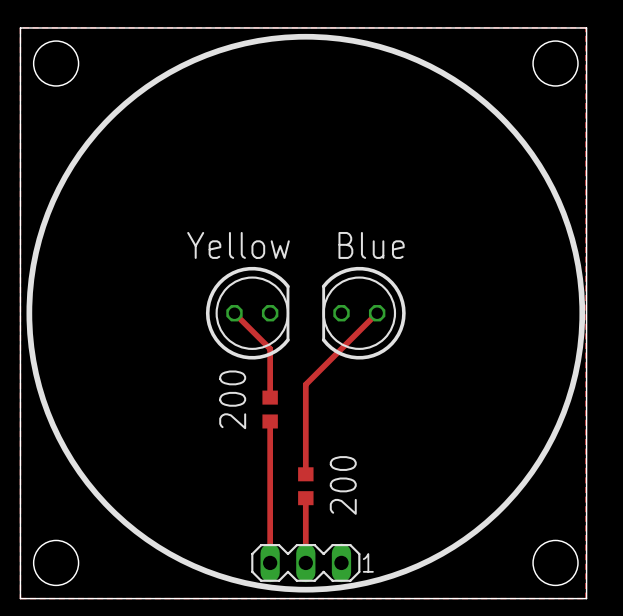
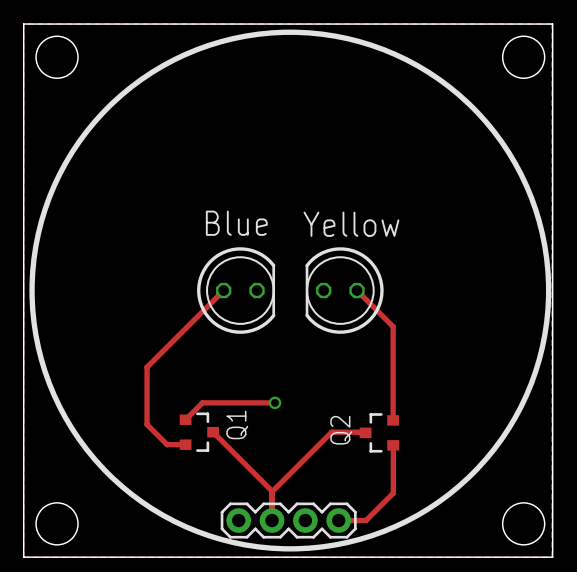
text position: Yellow (238, 245) -> Yellow (351, 224)
text position: Blue (371, 245) -> Blue (236, 223)
track: (234, 313) (270, 348) (270, 397) -> (223, 290) (147, 367) (147, 424) (167, 444) (185, 444)
track: (377, 313) (305, 384) (305, 474) -> (357, 290) (393, 326) (393, 420)
text: 200 (232, 399) -> none
part: (270, 409) -> none
track: (270, 421) (270, 562) -> none
track: none -> (275, 402) (202, 402) (185, 419)
via: none -> (275, 402)
Q1: none -> (199, 432)
track: none -> (213, 432) (272, 491) (272, 520)
track: none -> (359, 432) (365, 432) (331, 432) (272, 491)
Q2: none -> (379, 432)
track: none -> (393, 445) (393, 493) (366, 520) (338, 520)
text: 200 (343, 485) -> none
part: (305, 486) -> none
track: (305, 498) (305, 562) -> none
part footprint: [251, 543, 361, 583] -> [220, 502, 357, 539]

